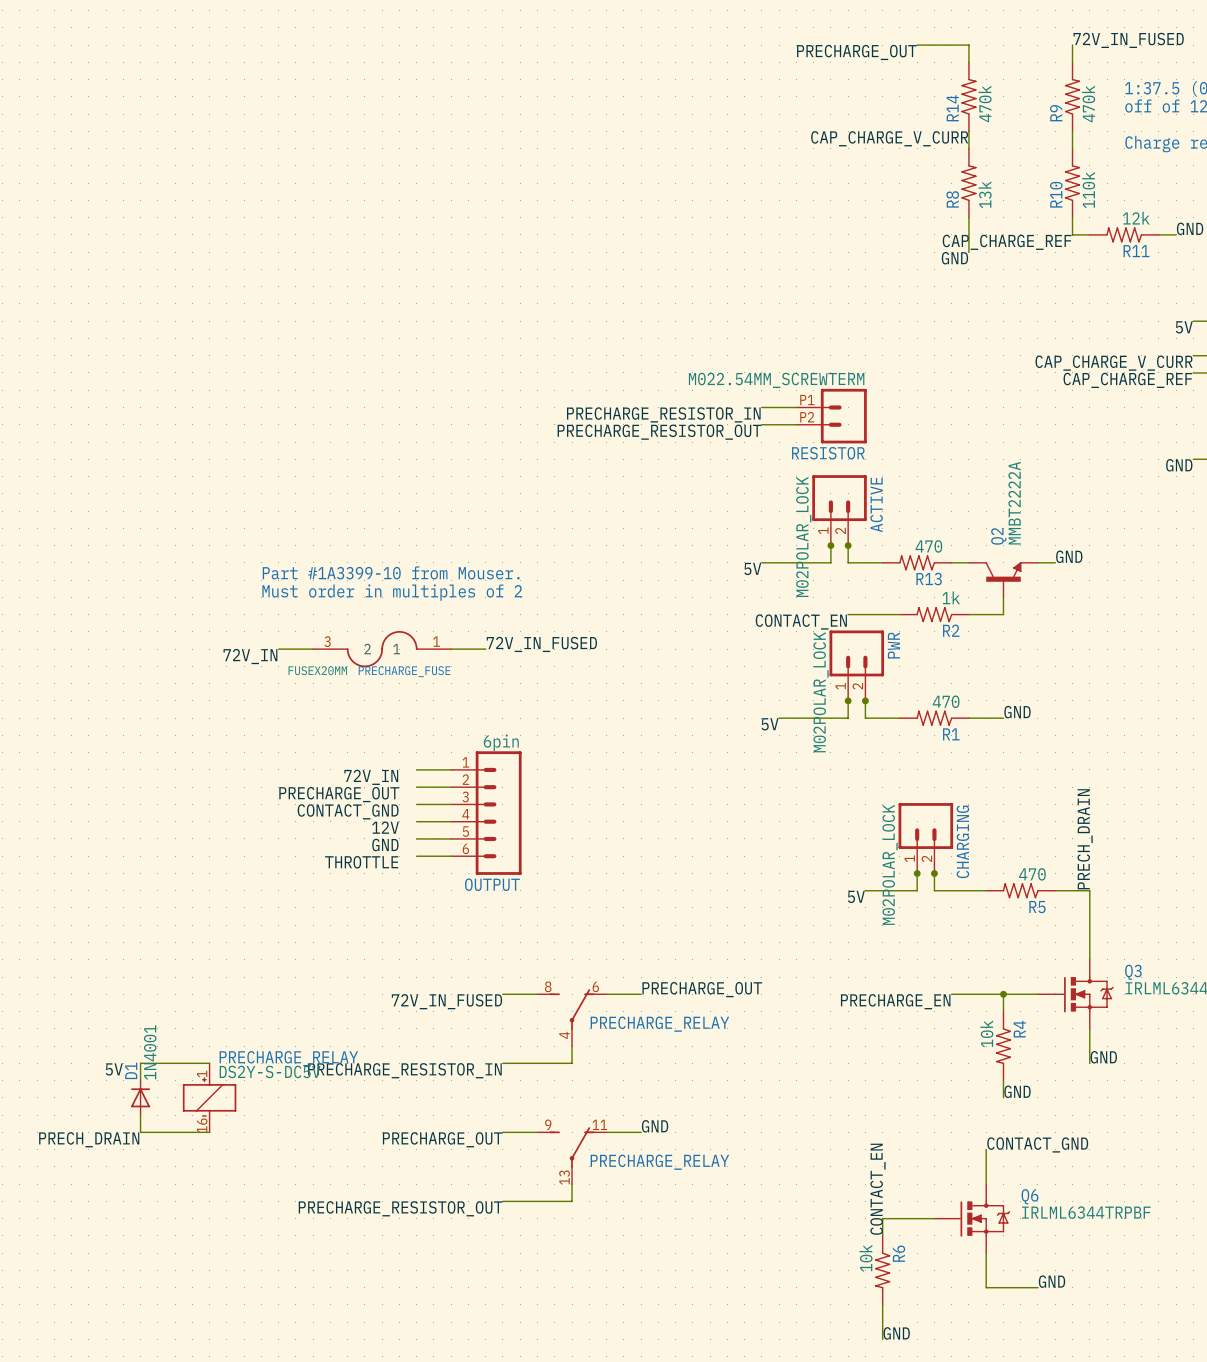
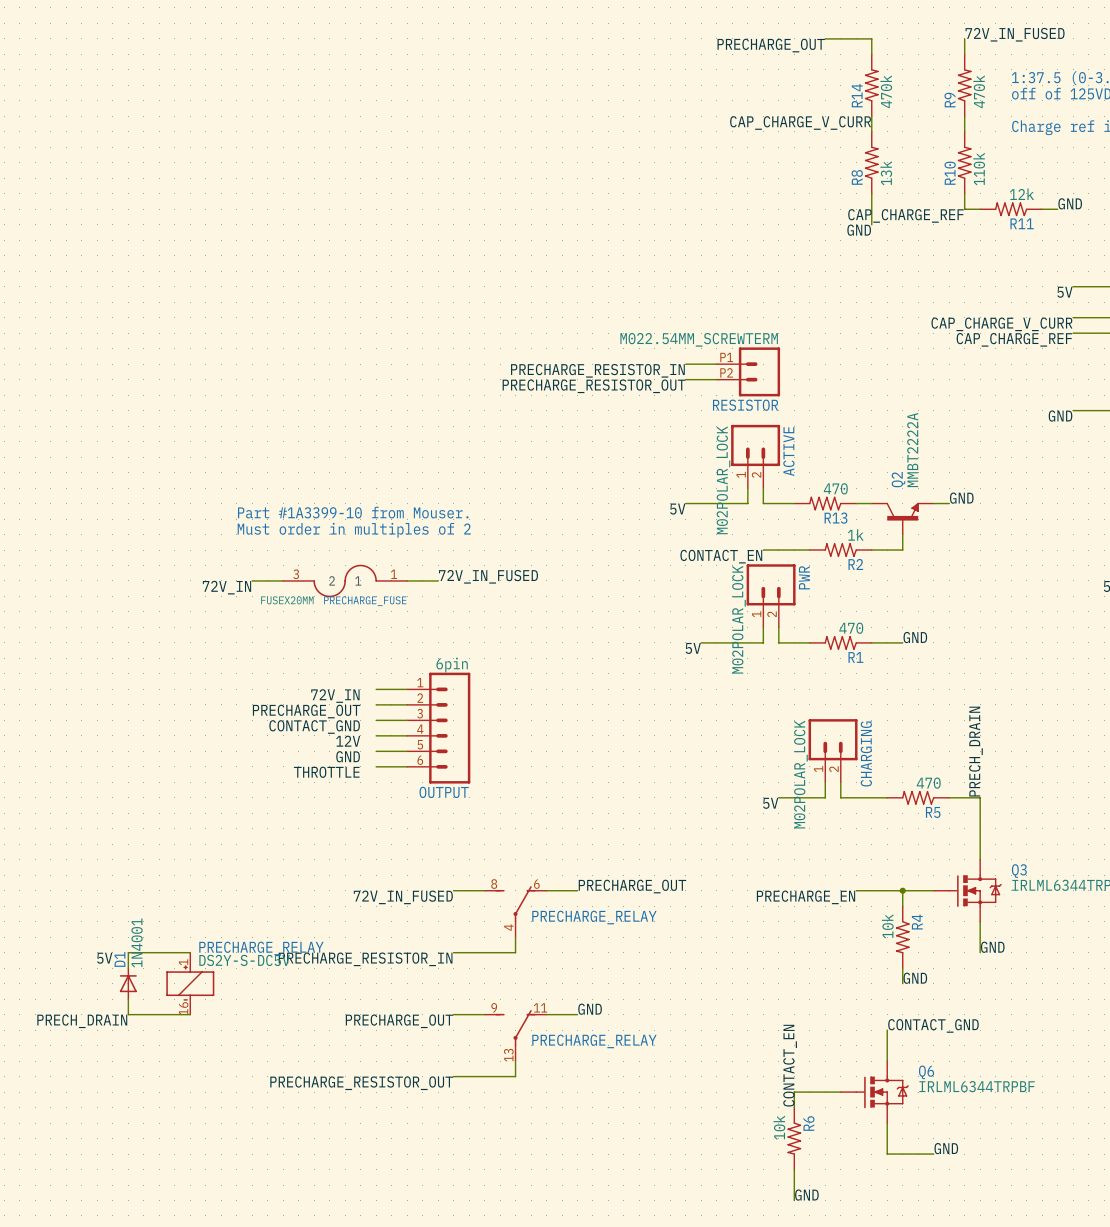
junction: (830, 545) -> none
junction: (848, 545) -> none
junction: (848, 700) -> none
junction: (865, 700) -> none
junction: (917, 873) -> none
junction: (934, 873) -> none

